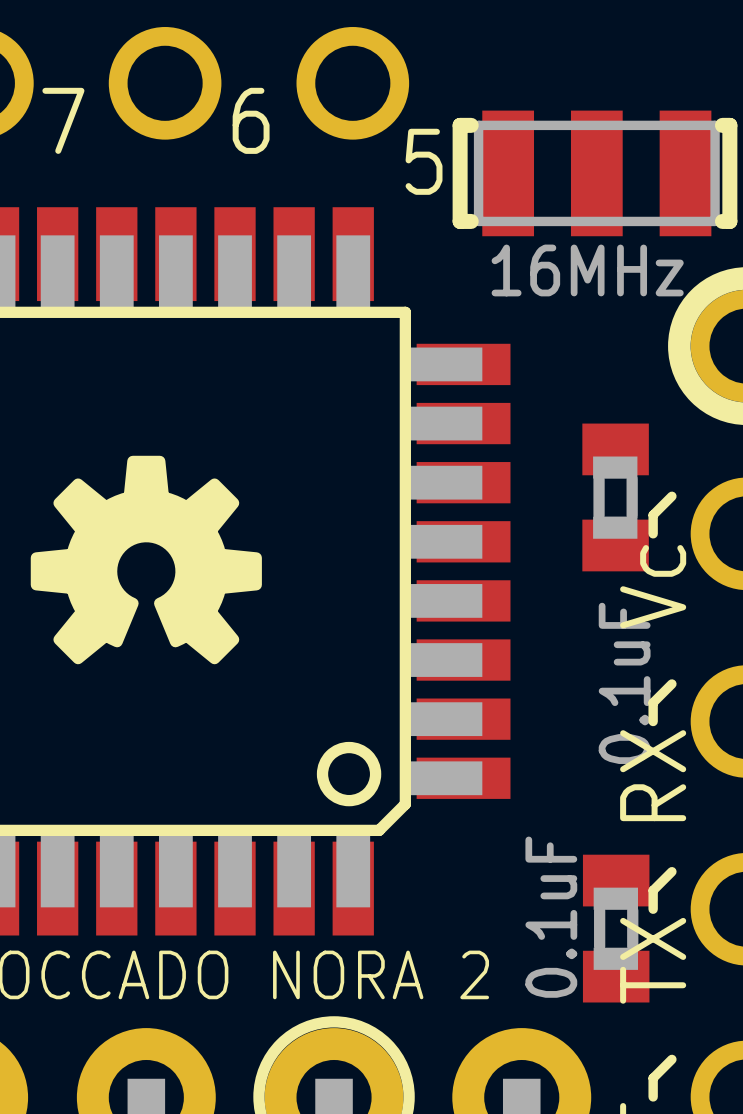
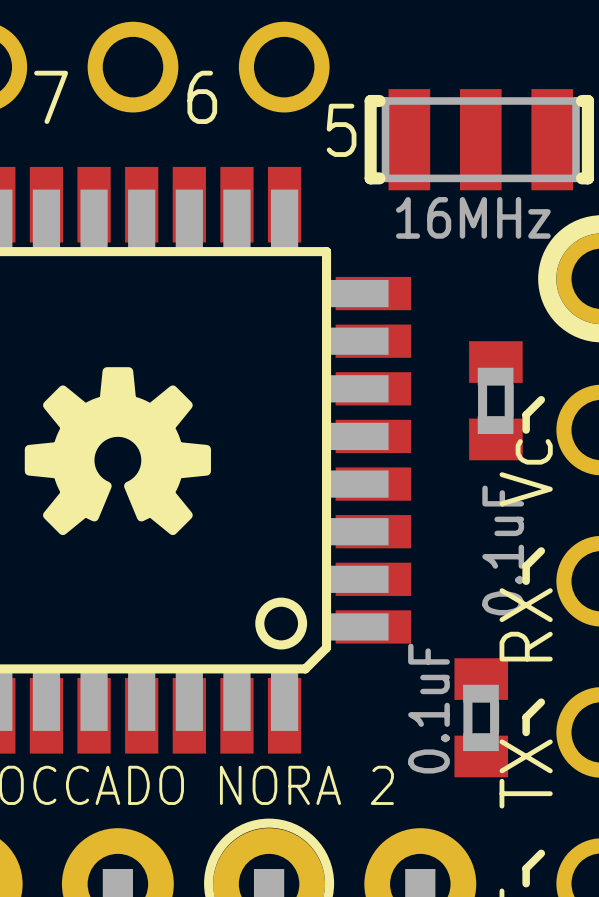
part position: (616, 928) -> (481, 717)

